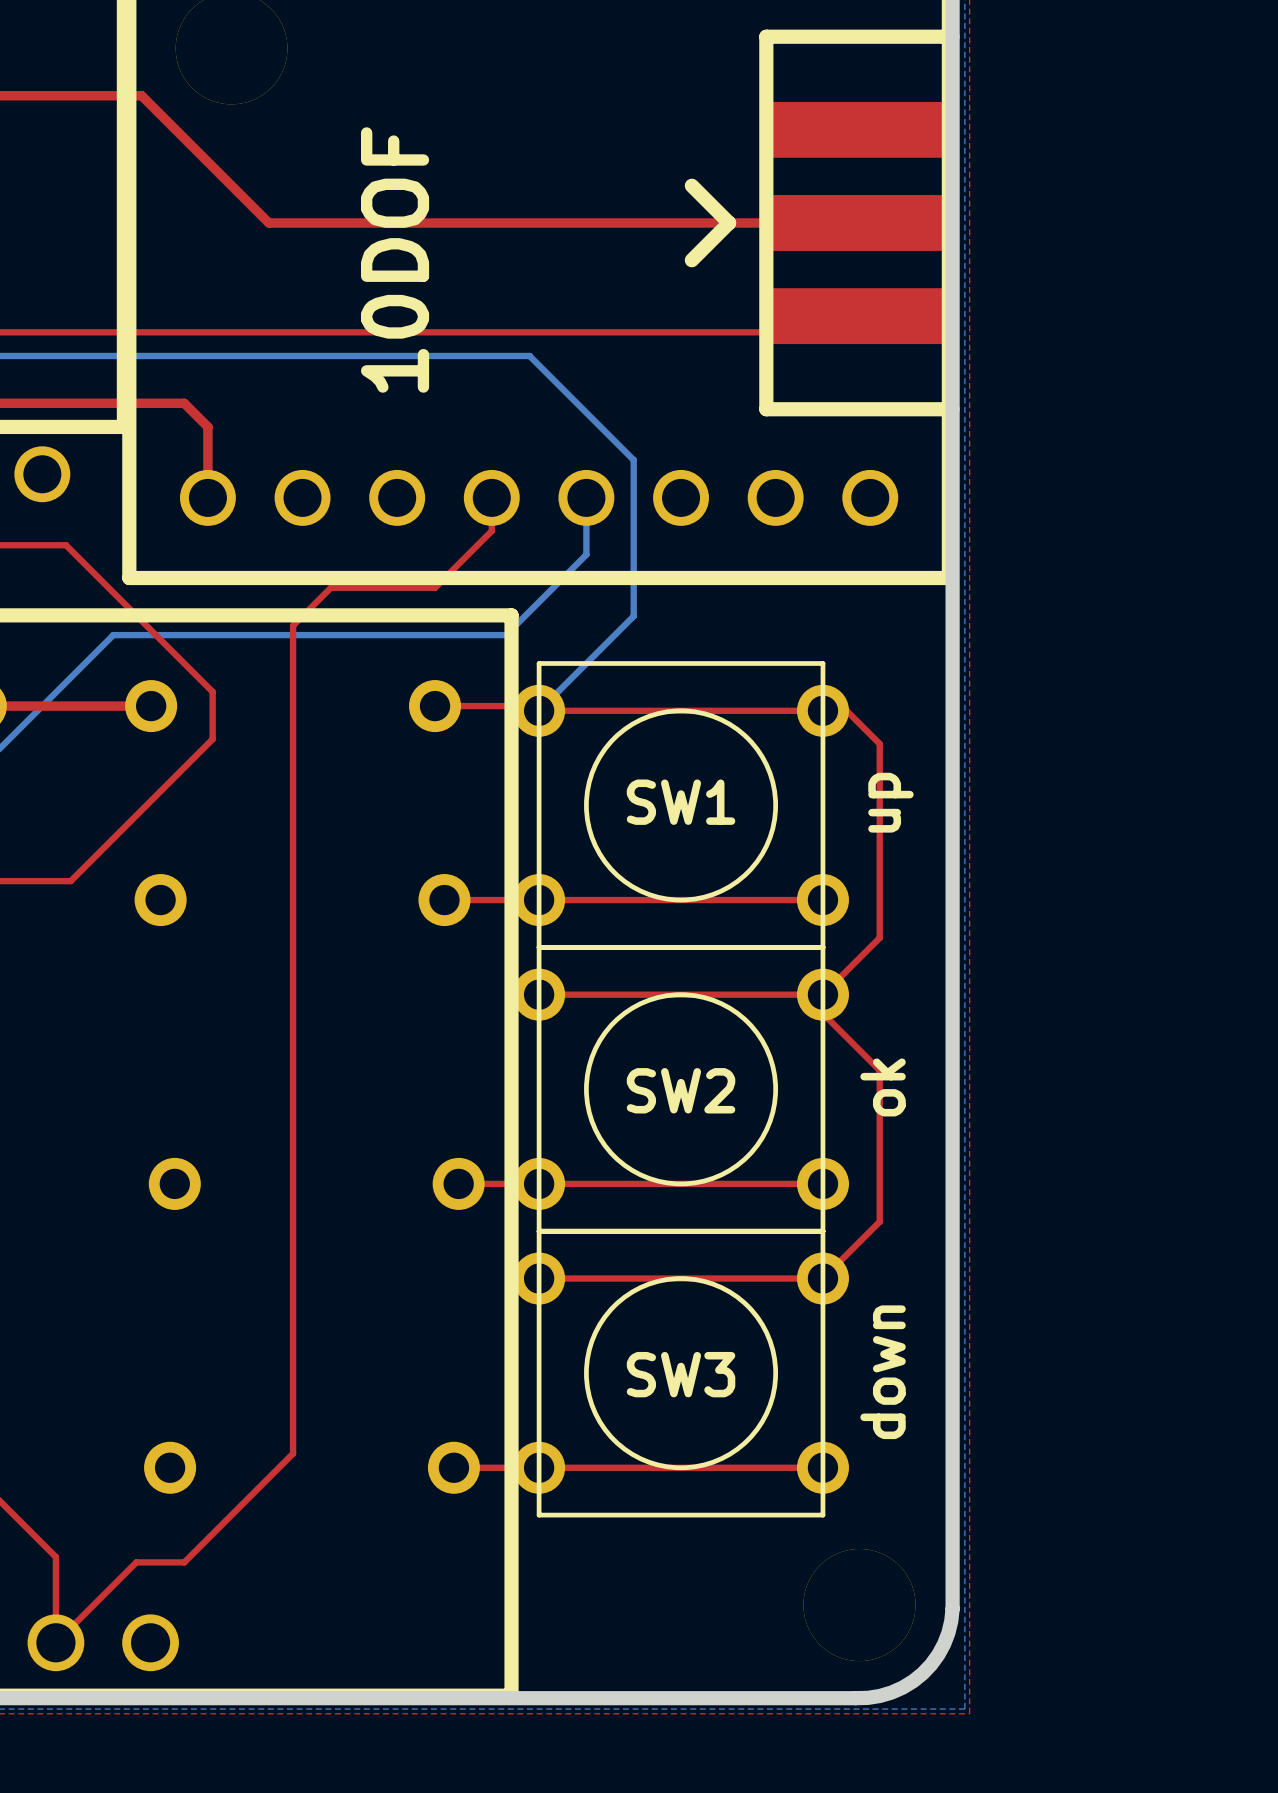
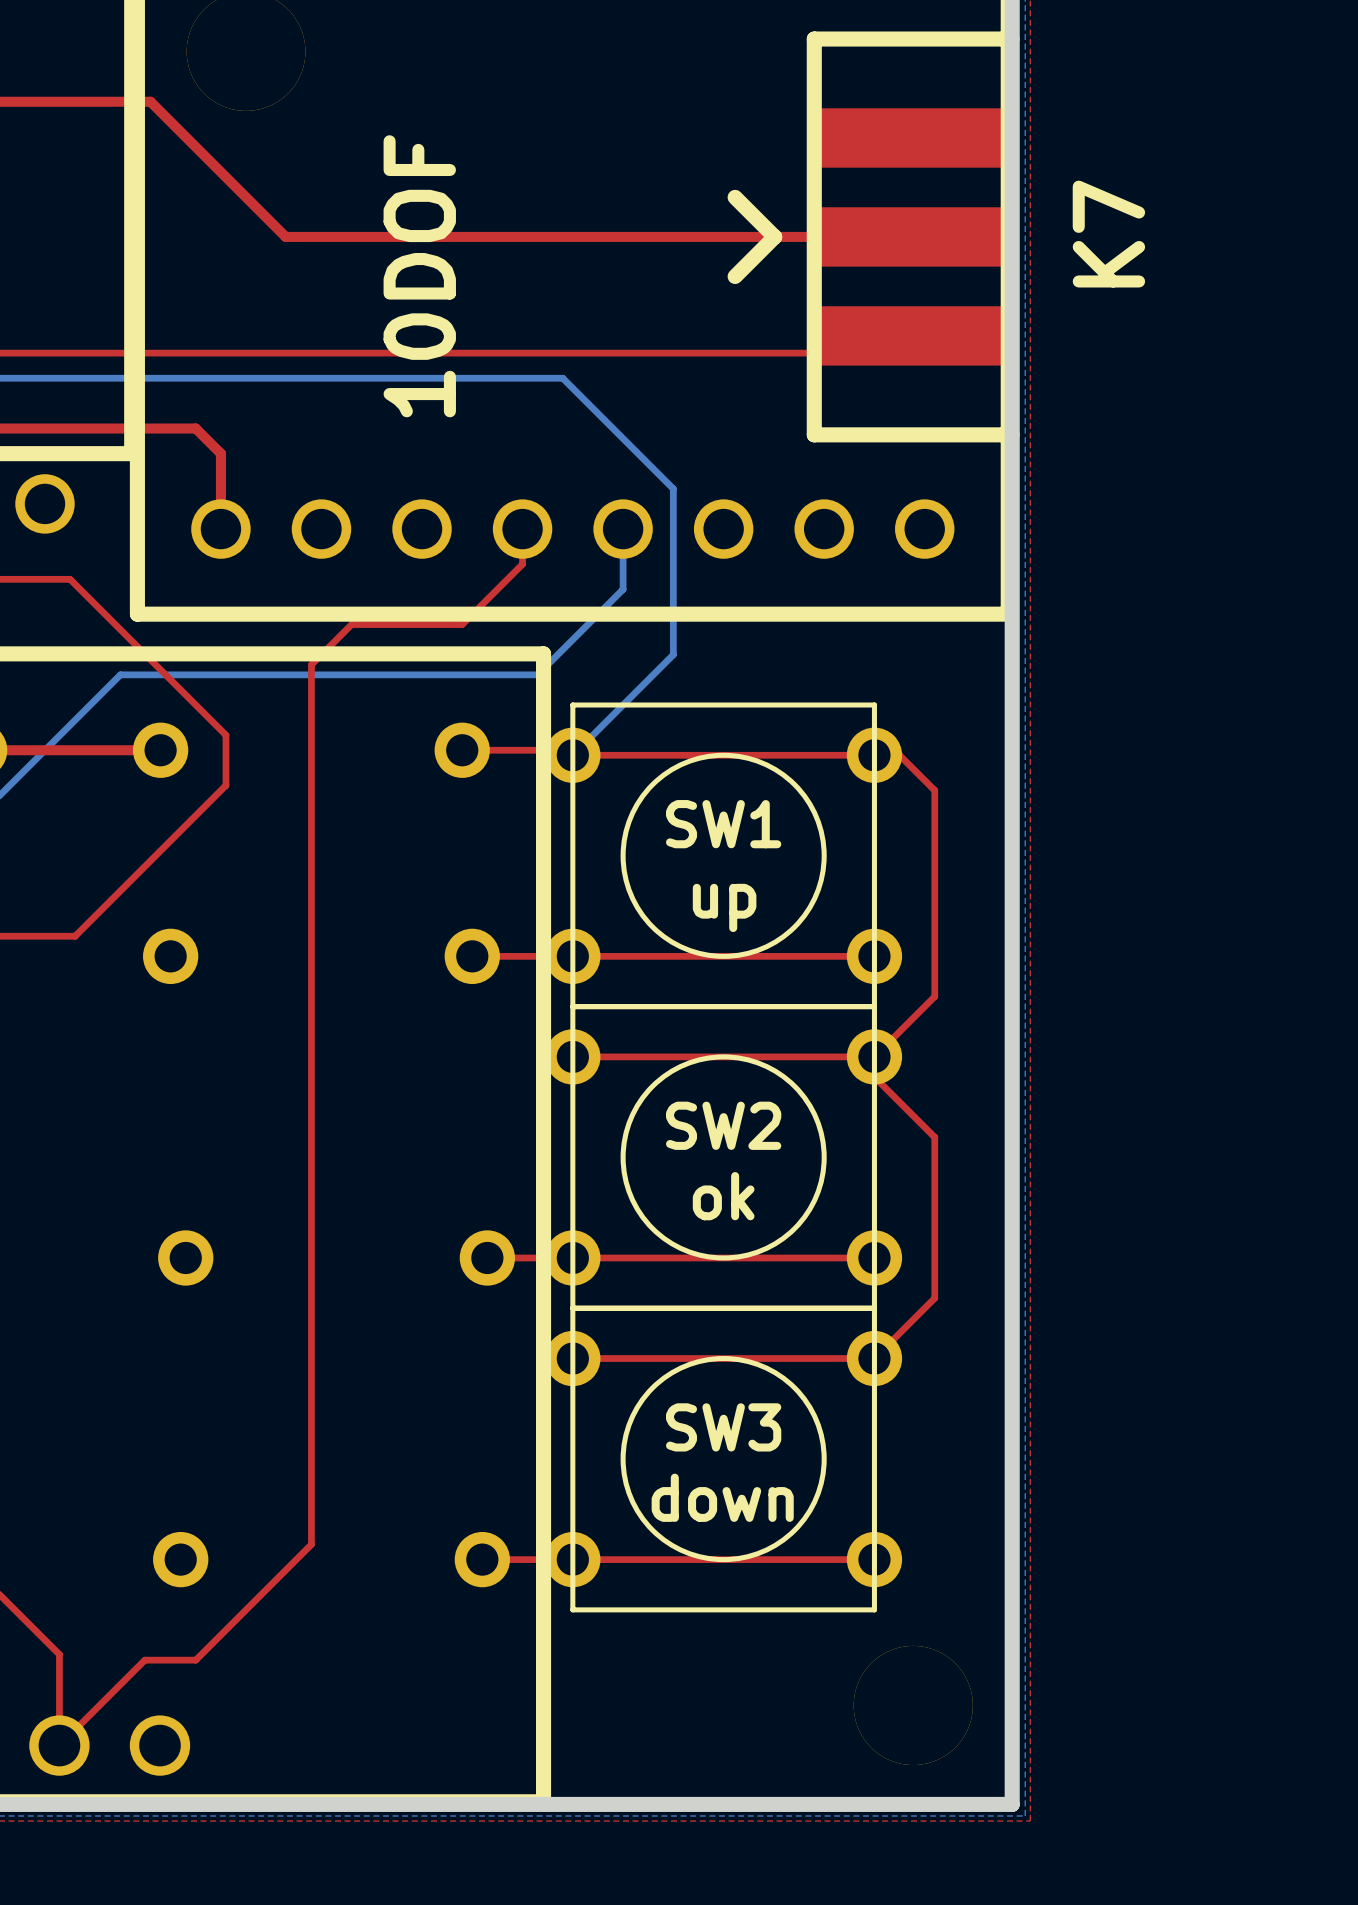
K7 name: none -> K7 (1108, 234)
SW1 name position: SW1 (681, 802) -> SW1 (723, 824)
SW1 value rotation: 0° (890, 802) -> 90° clockwise (724, 907)
SW1 value position: up (890, 802) -> up (724, 907)
SW2 value rotation: 0° (883, 1087) -> 90° clockwise (723, 1196)
SW2 value position: ok (883, 1087) -> ok (723, 1196)
SW2 name position: SW2 (681, 1090) -> SW2 (723, 1125)
SW3 value rotation: 0° (883, 1372) -> 90° clockwise (722, 1497)
SW3 value position: down (883, 1372) -> down (722, 1497)
SW3 name position: SW3 (681, 1374) -> SW3 (723, 1427)
board edge: (952, 1608) (948, 1632) (944, 1644) (931, 1664) (922, 1673) (913, 1681) (891, 1692) (867, 1697) (855, 1698) -> (1012, 1709) (1012, 1804) (909, 1804)

